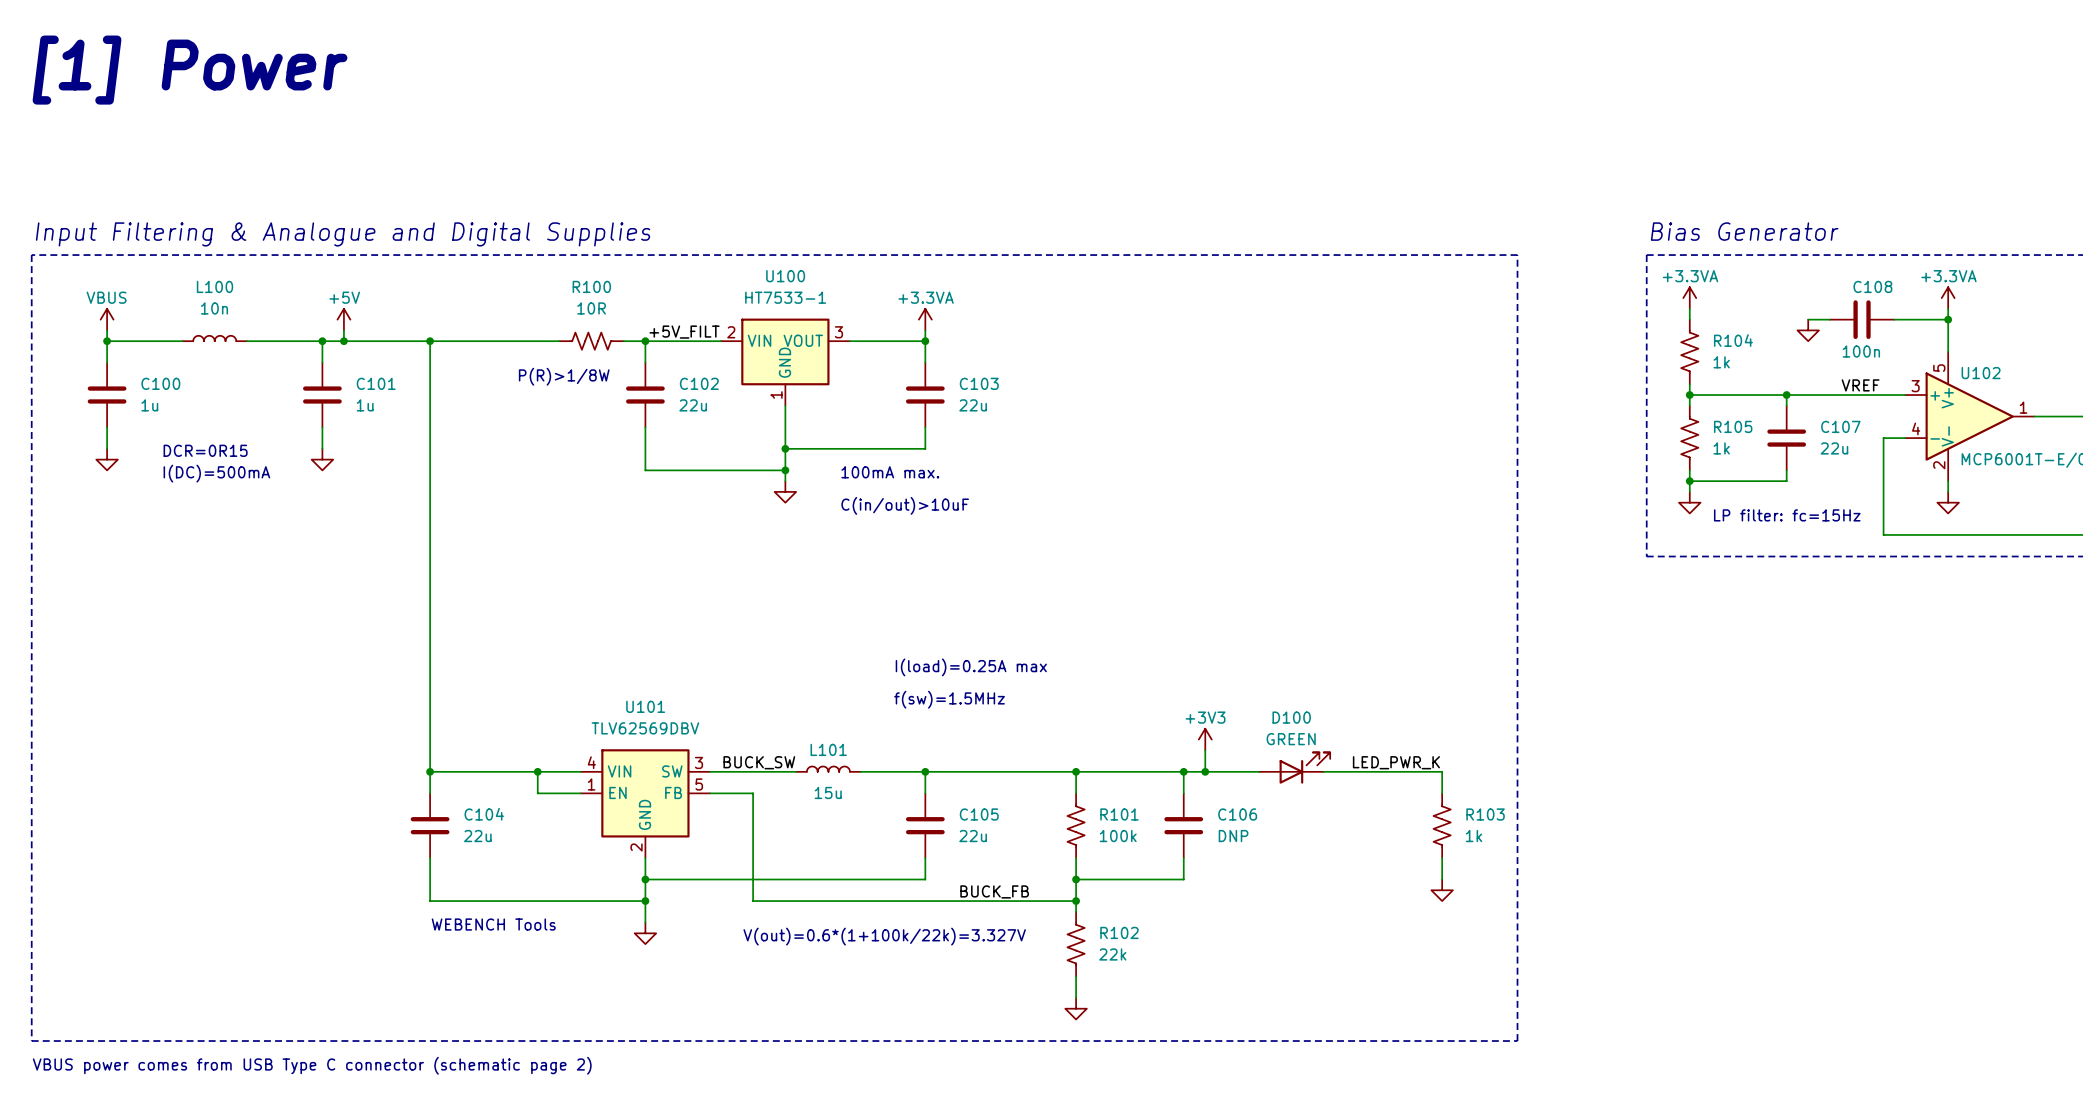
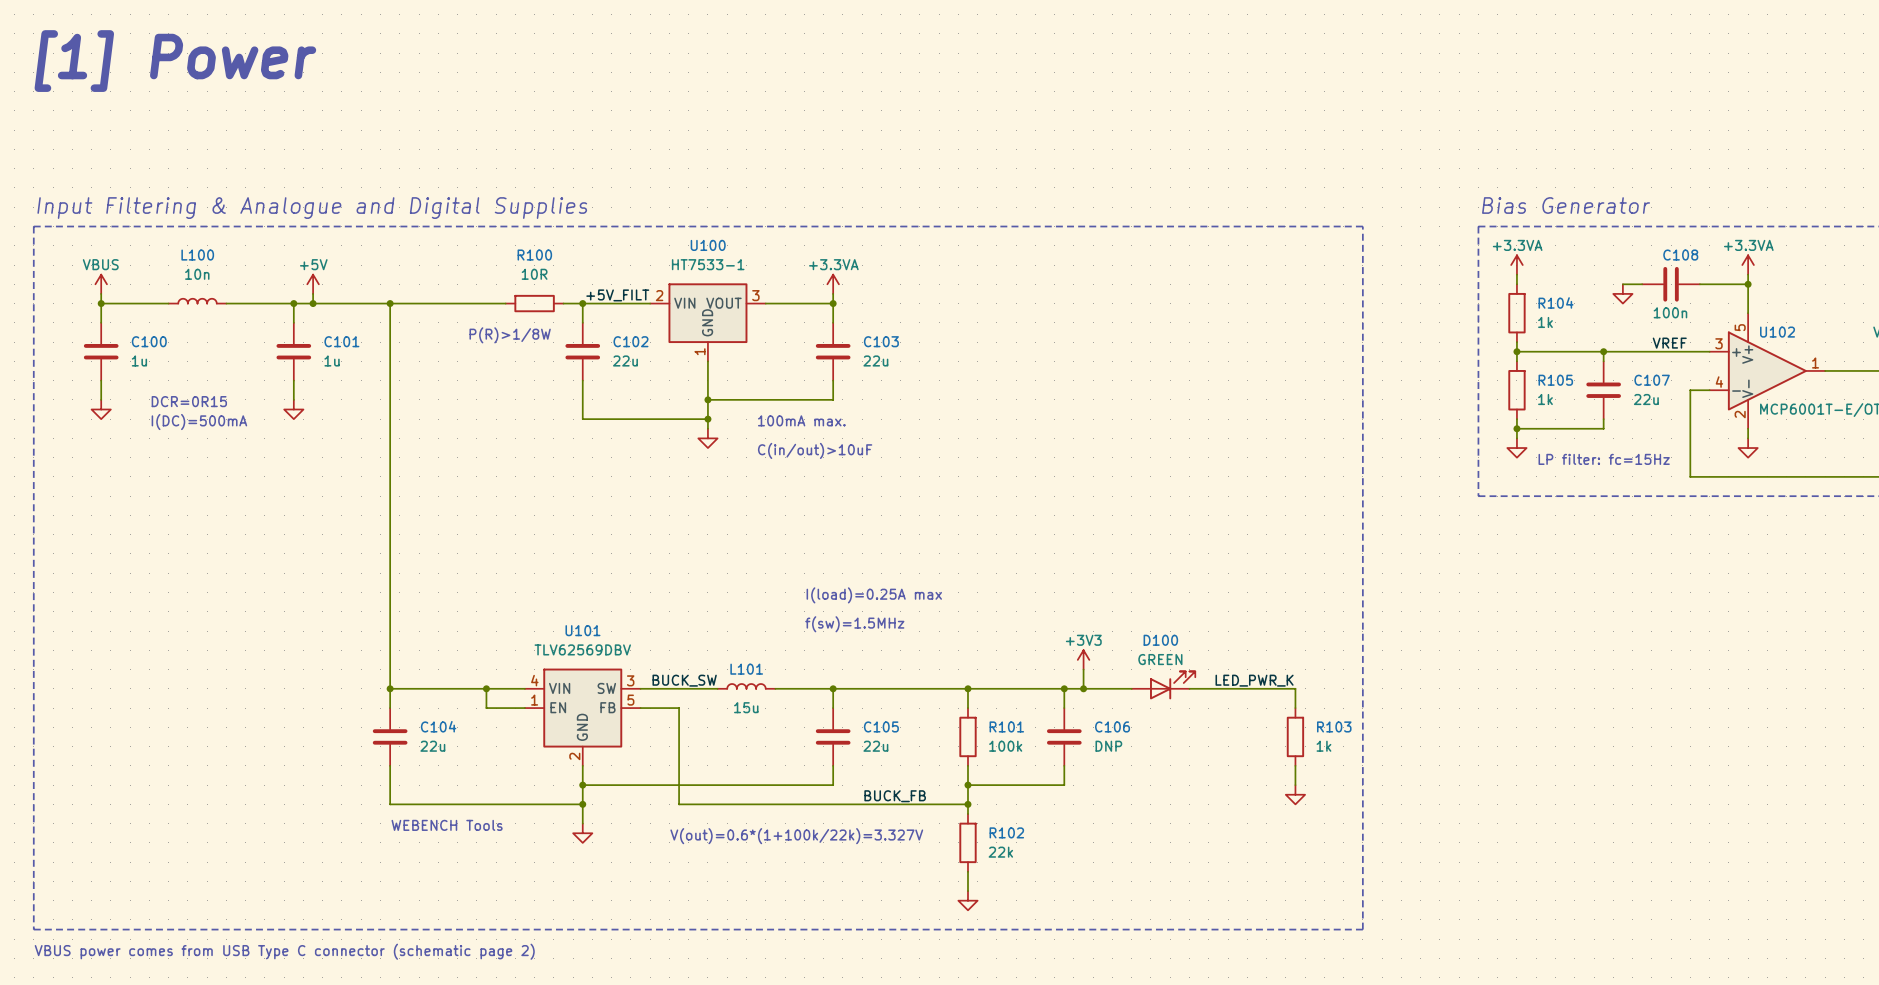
R104 symbol: [1681, 319, 1699, 385] -> [1508, 284, 1526, 343]
R100 symbol: [559, 332, 624, 350] -> [505, 294, 564, 313]
R105 symbol: [1681, 405, 1699, 471] -> [1508, 361, 1526, 420]
R101 symbol: [1067, 793, 1085, 858] -> [959, 708, 977, 766]
R103 symbol: [1433, 793, 1451, 858] -> [1286, 708, 1305, 766]
R102 symbol: [1067, 911, 1085, 977] -> [959, 814, 977, 872]

